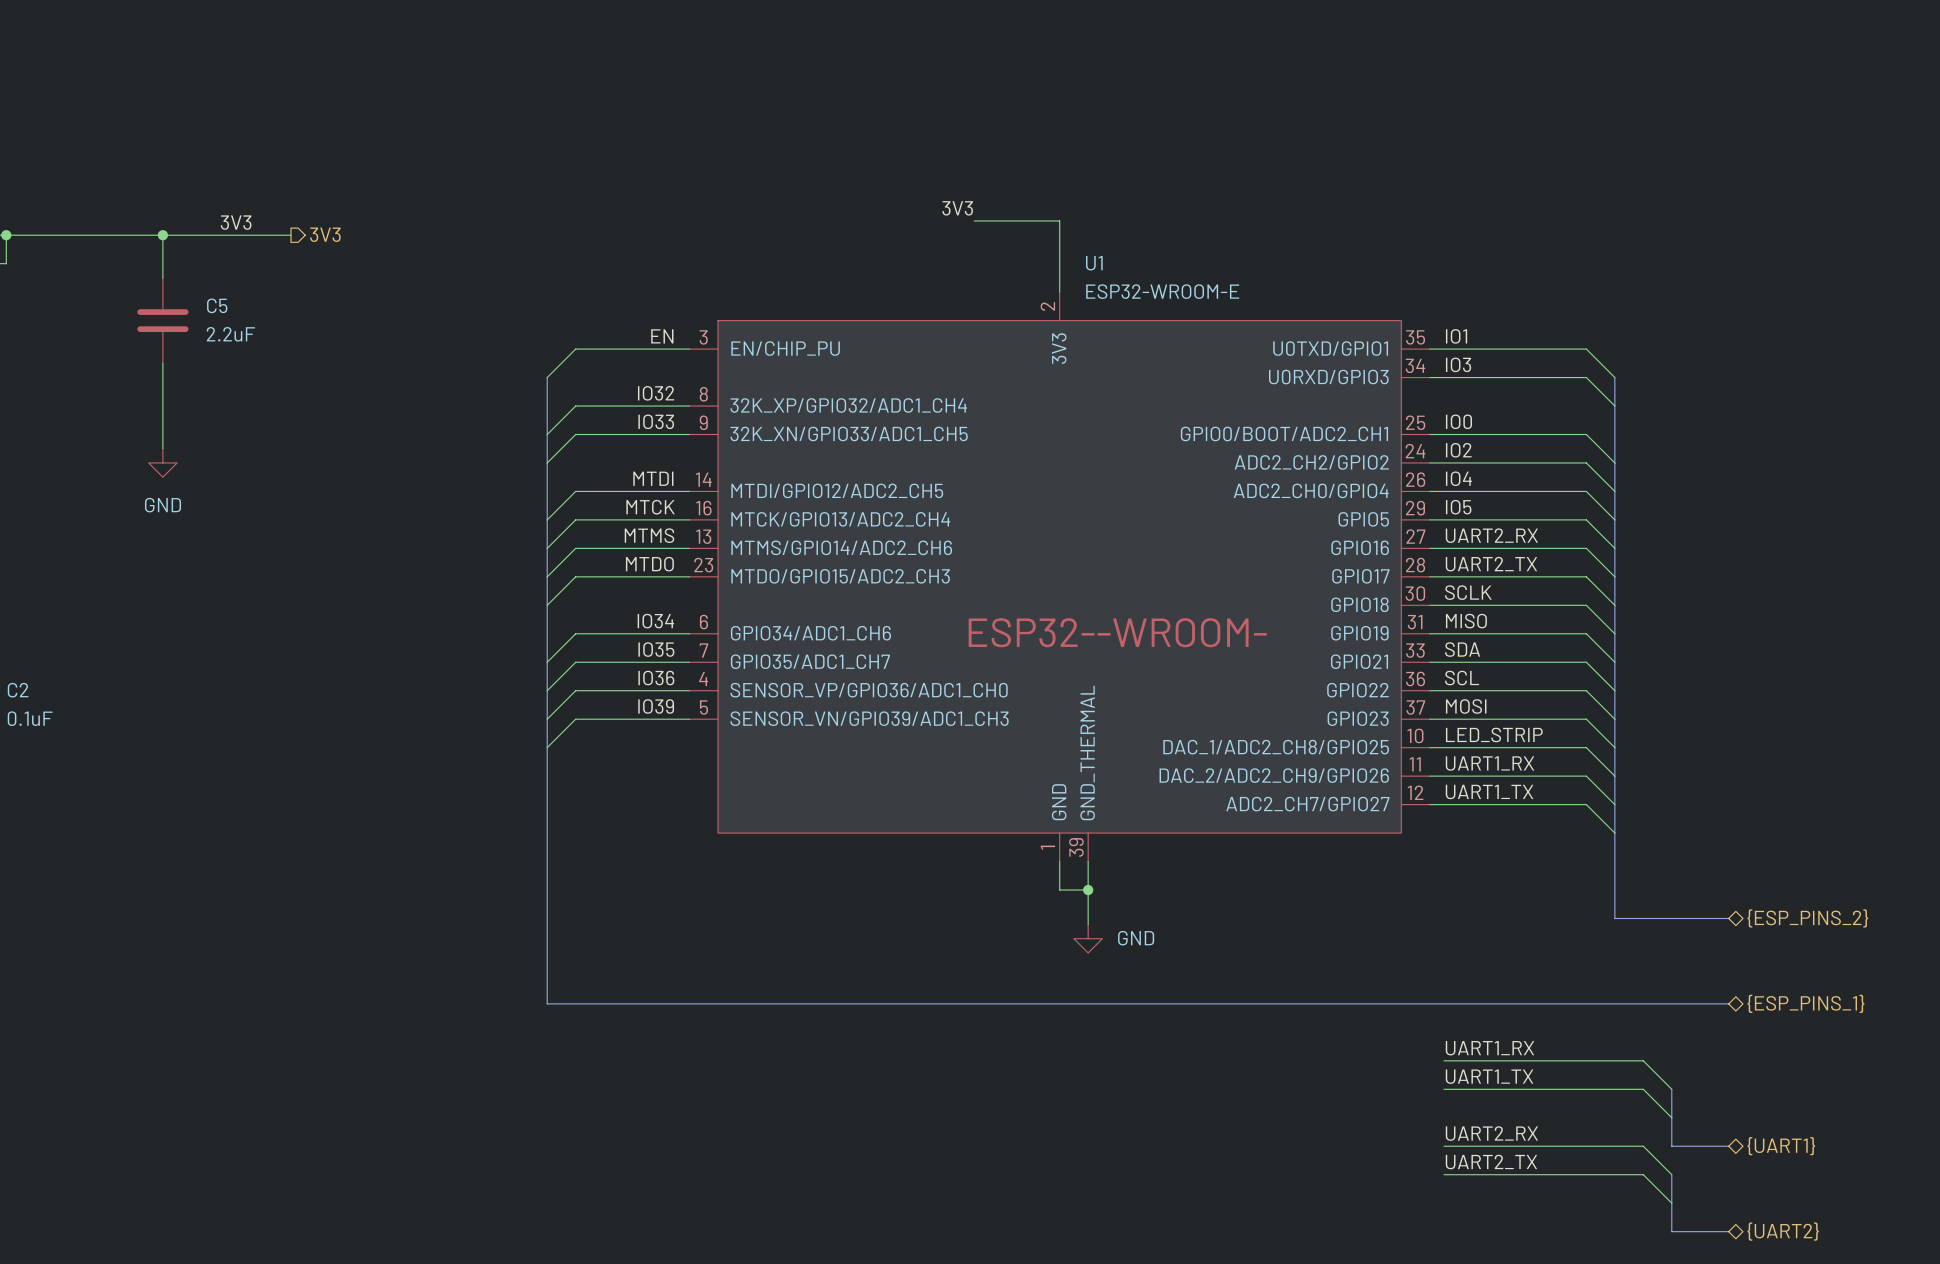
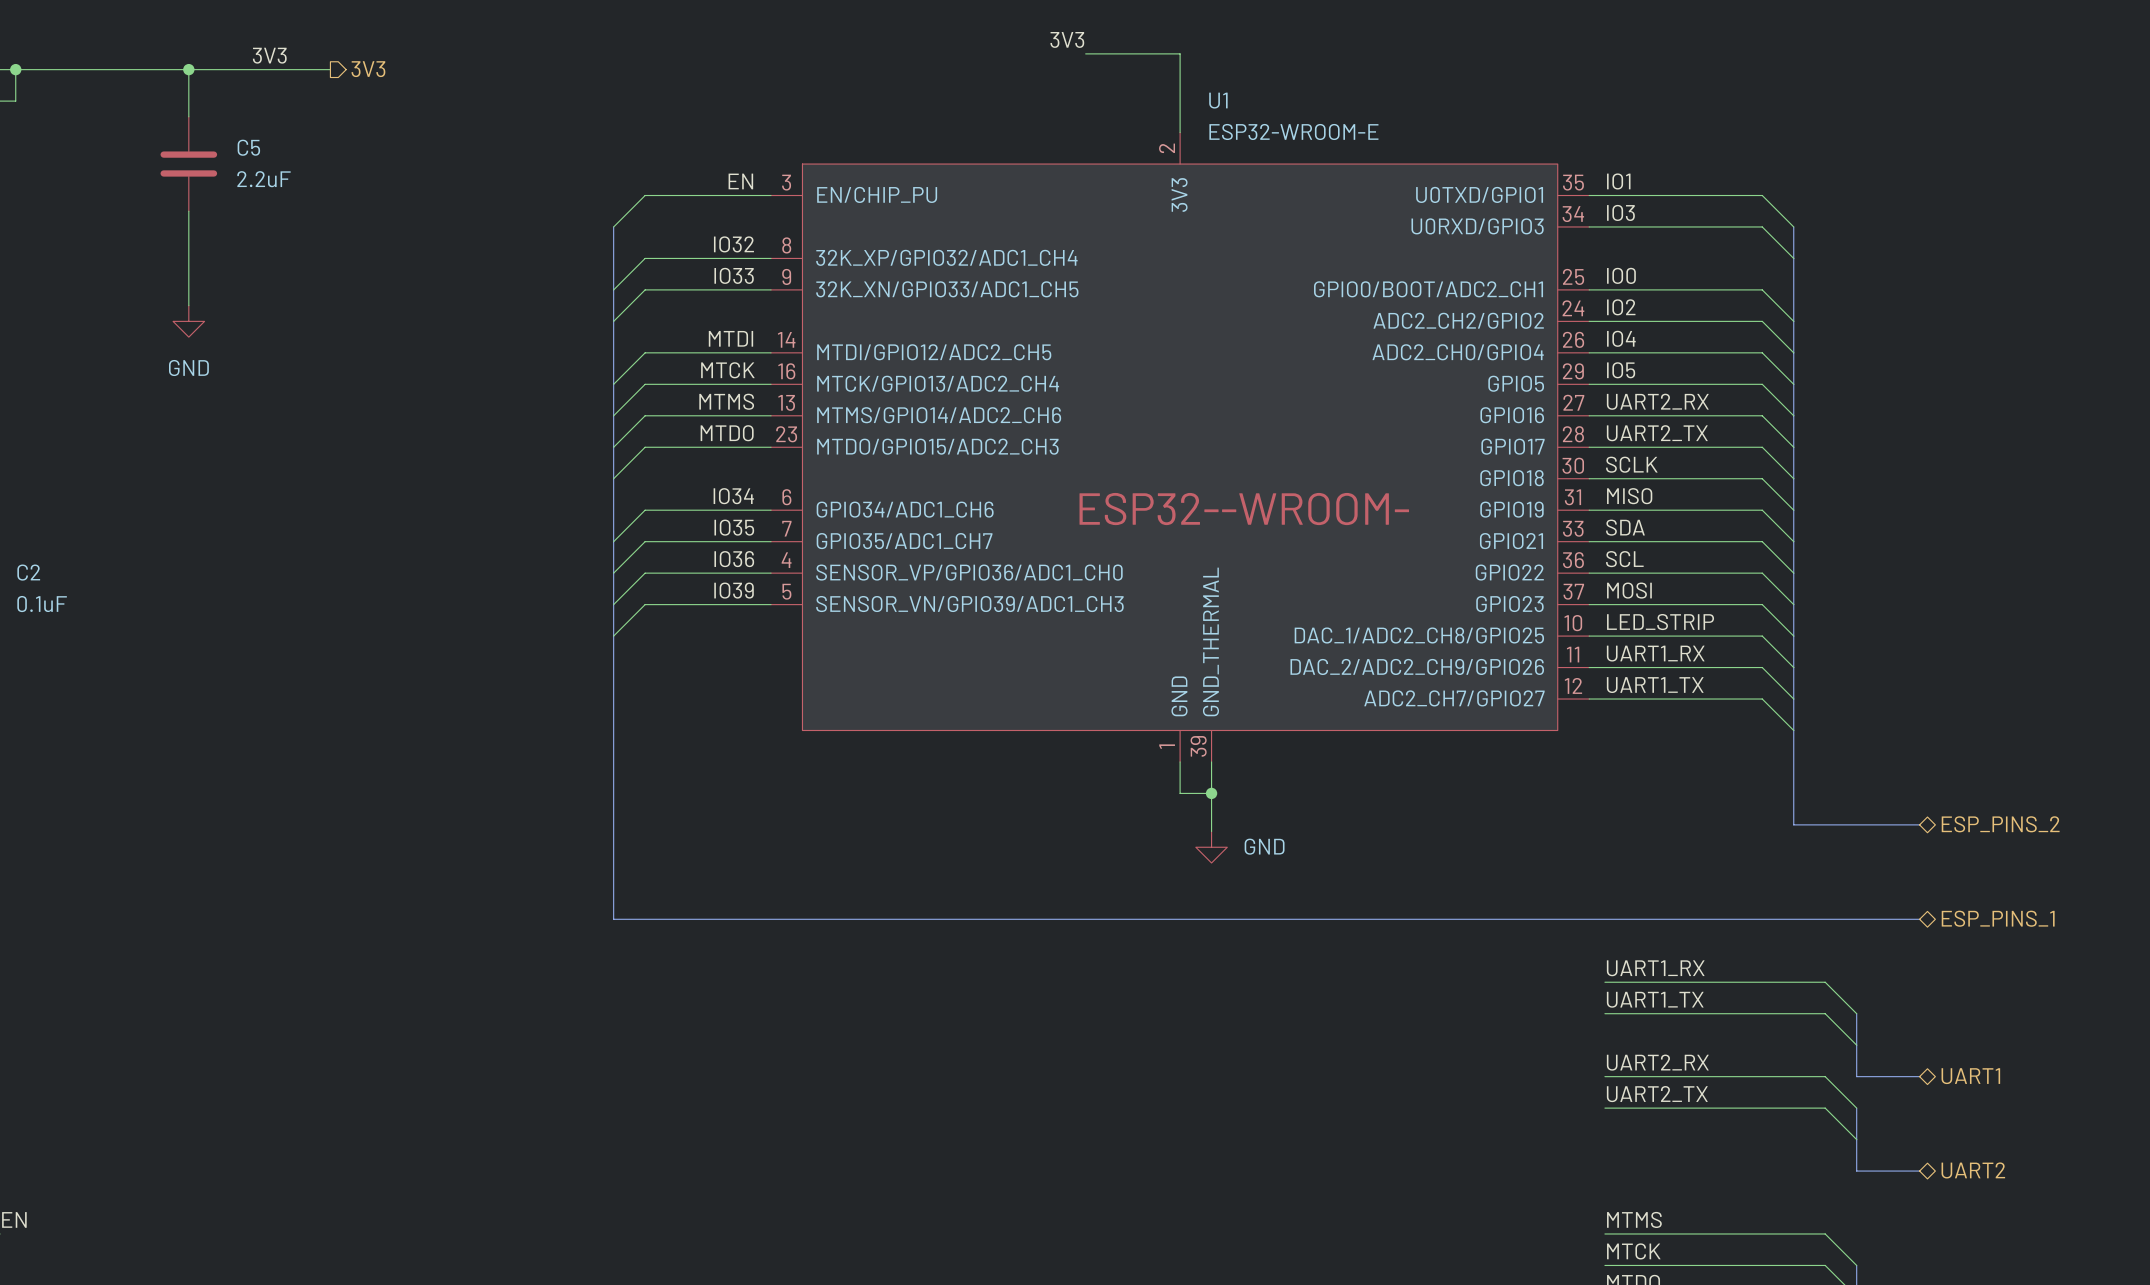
hierarchical label: {ESP_PINS_2} (1807, 918) -> ESP_PINS_2 (2000, 824)
hierarchical label: {ESP_PINS_1} (1805, 1003) -> ESP_PINS_1 (1998, 918)
hierarchical label: {UART1} (1781, 1146) -> UART1 (1970, 1076)
hierarchical label: {UART2} (1783, 1231) -> UART2 (1973, 1170)

